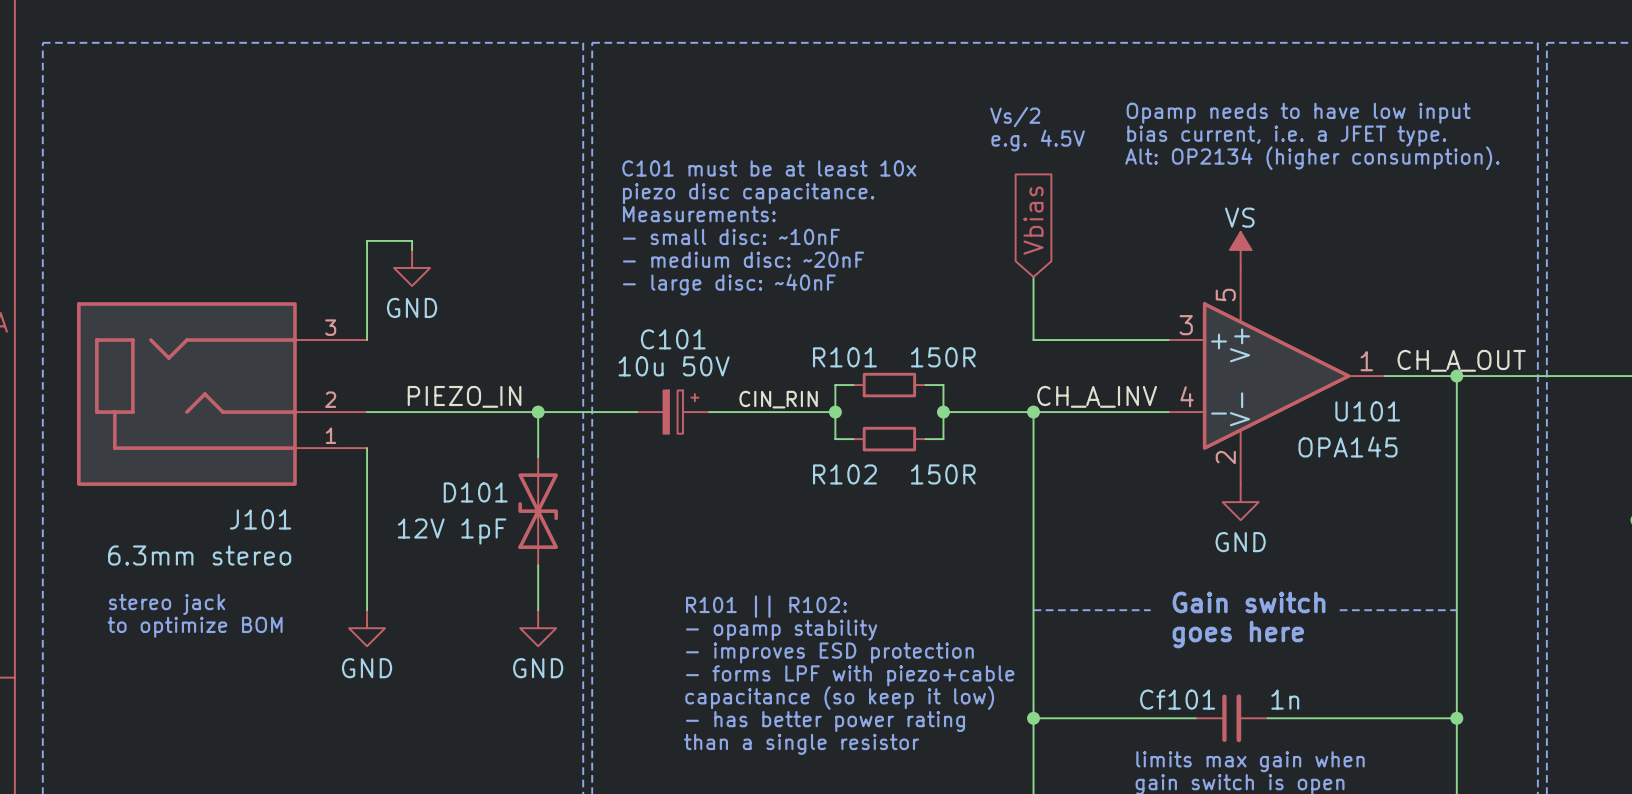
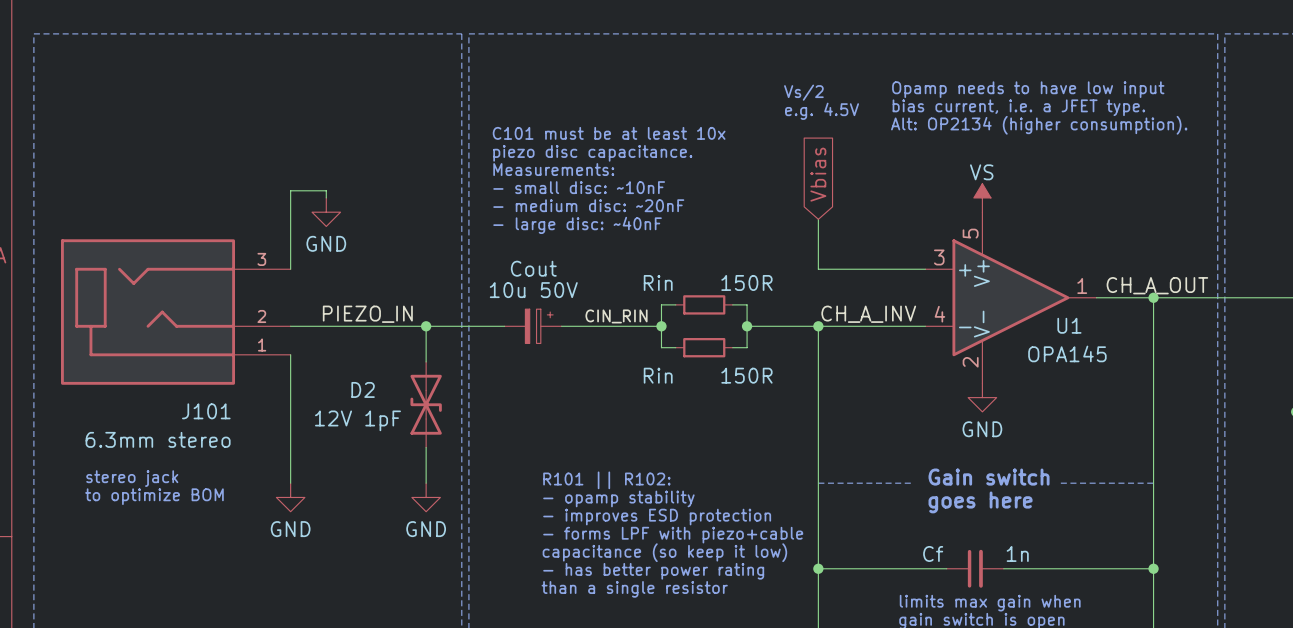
C101 name: C101 (673, 339) -> Cout (533, 268)
R101 name: R101 (844, 357) -> Rin (658, 282)
U101 name: U101 (1367, 411) -> U1 (1069, 325)
R102 name: R102 (844, 474) -> Rin (658, 375)
D101 name: D101 (475, 492) -> D2 (363, 389)
Cf101 name: Cf101 (1177, 699) -> Cf (933, 553)

